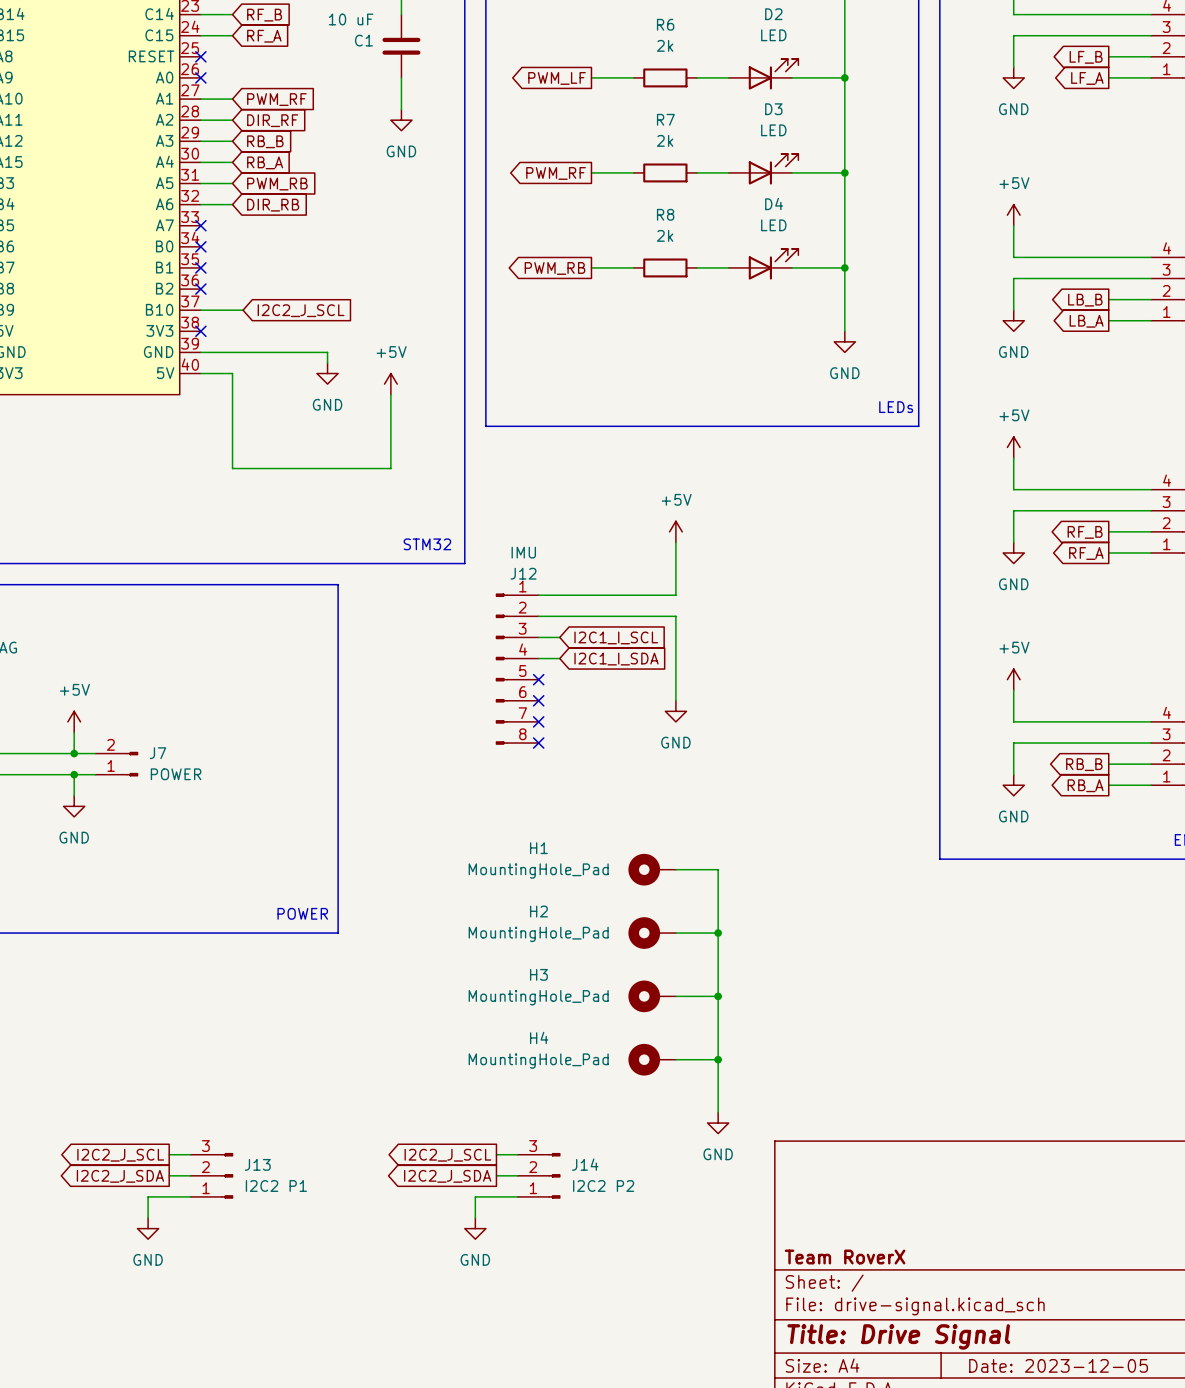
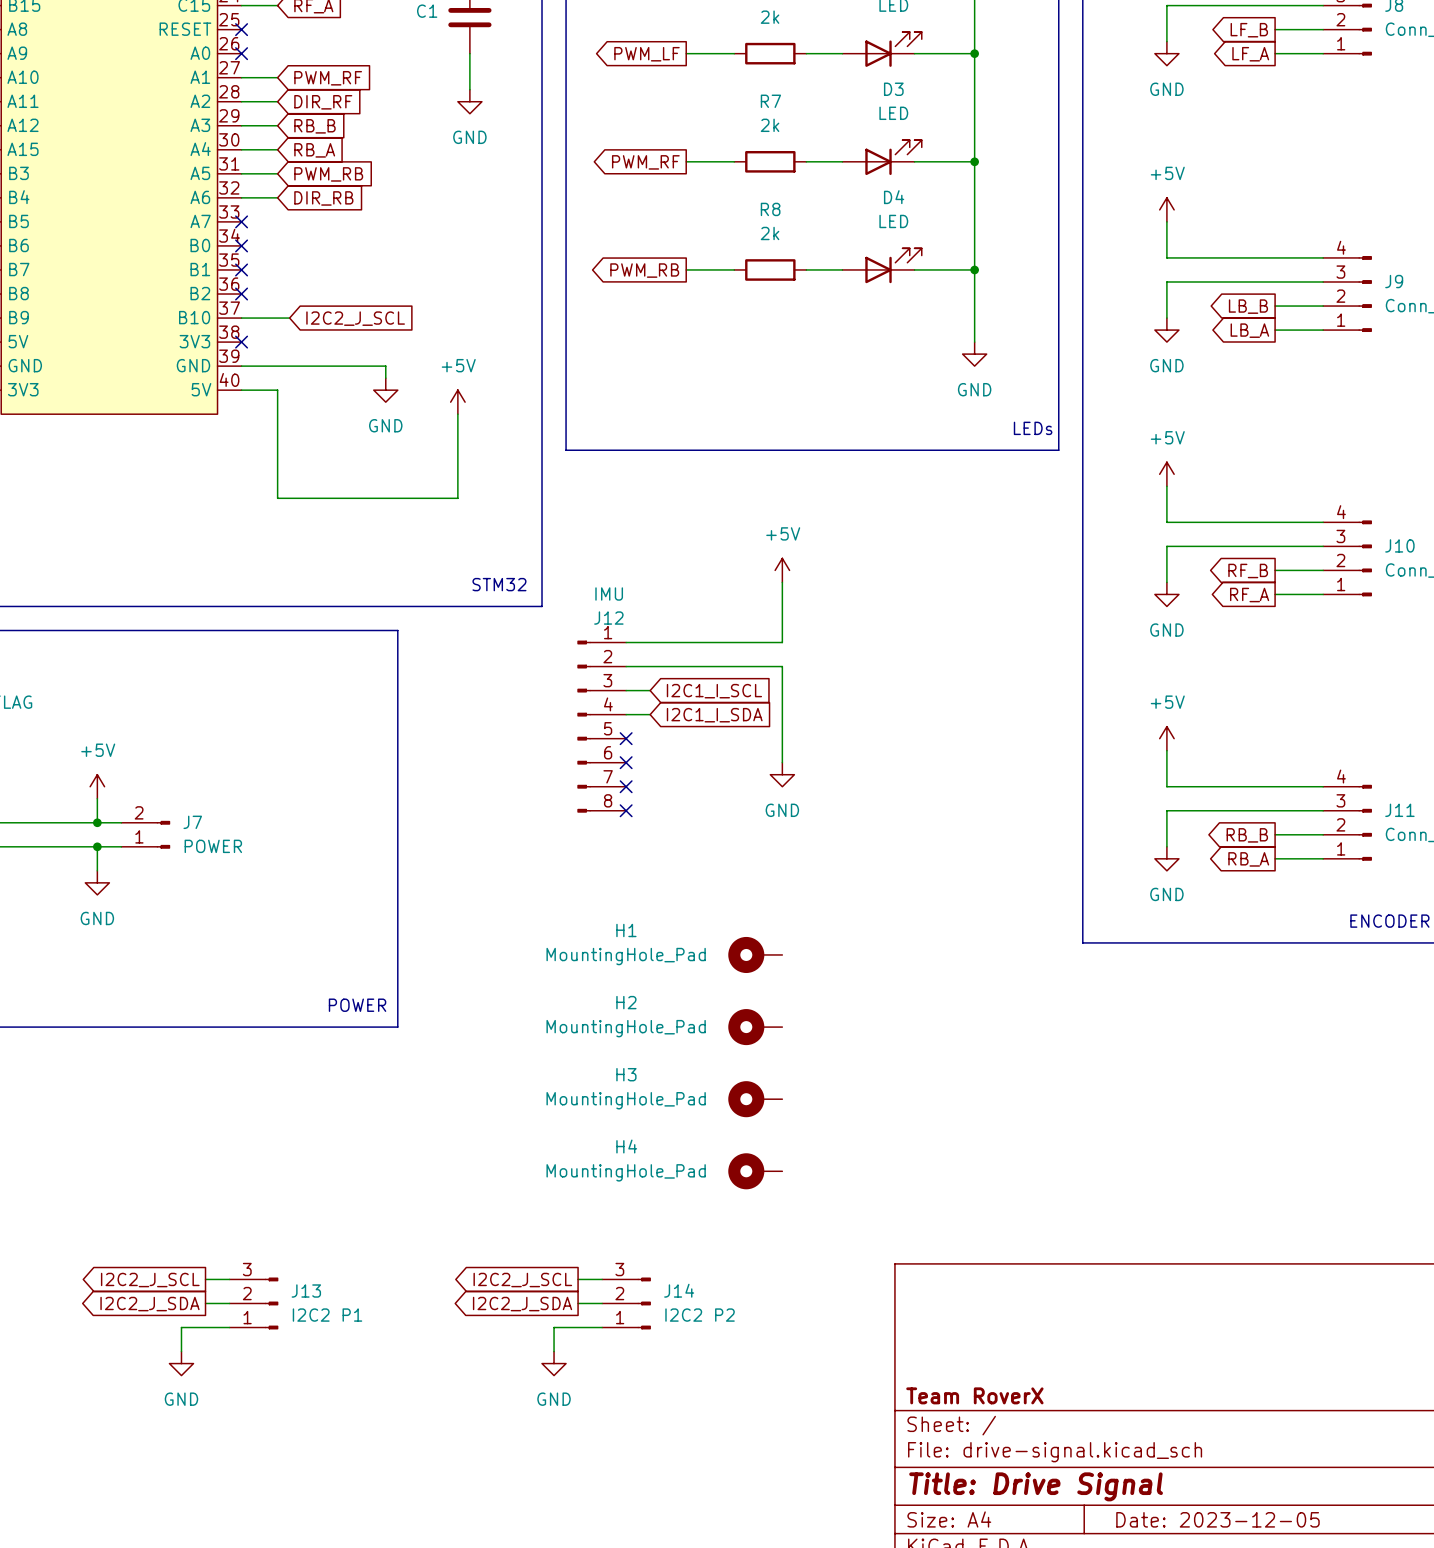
wire: (675, 869) (718, 869) (718, 1112) -> none
wire: (675, 933) (718, 933) -> none
junction: (718, 933) -> none
wire: (675, 996) (718, 996) -> none
junction: (718, 996) -> none
wire: (675, 1059) (718, 1059) -> none
junction: (718, 1059) -> none
power symbol: GND (718, 1123) -> none

